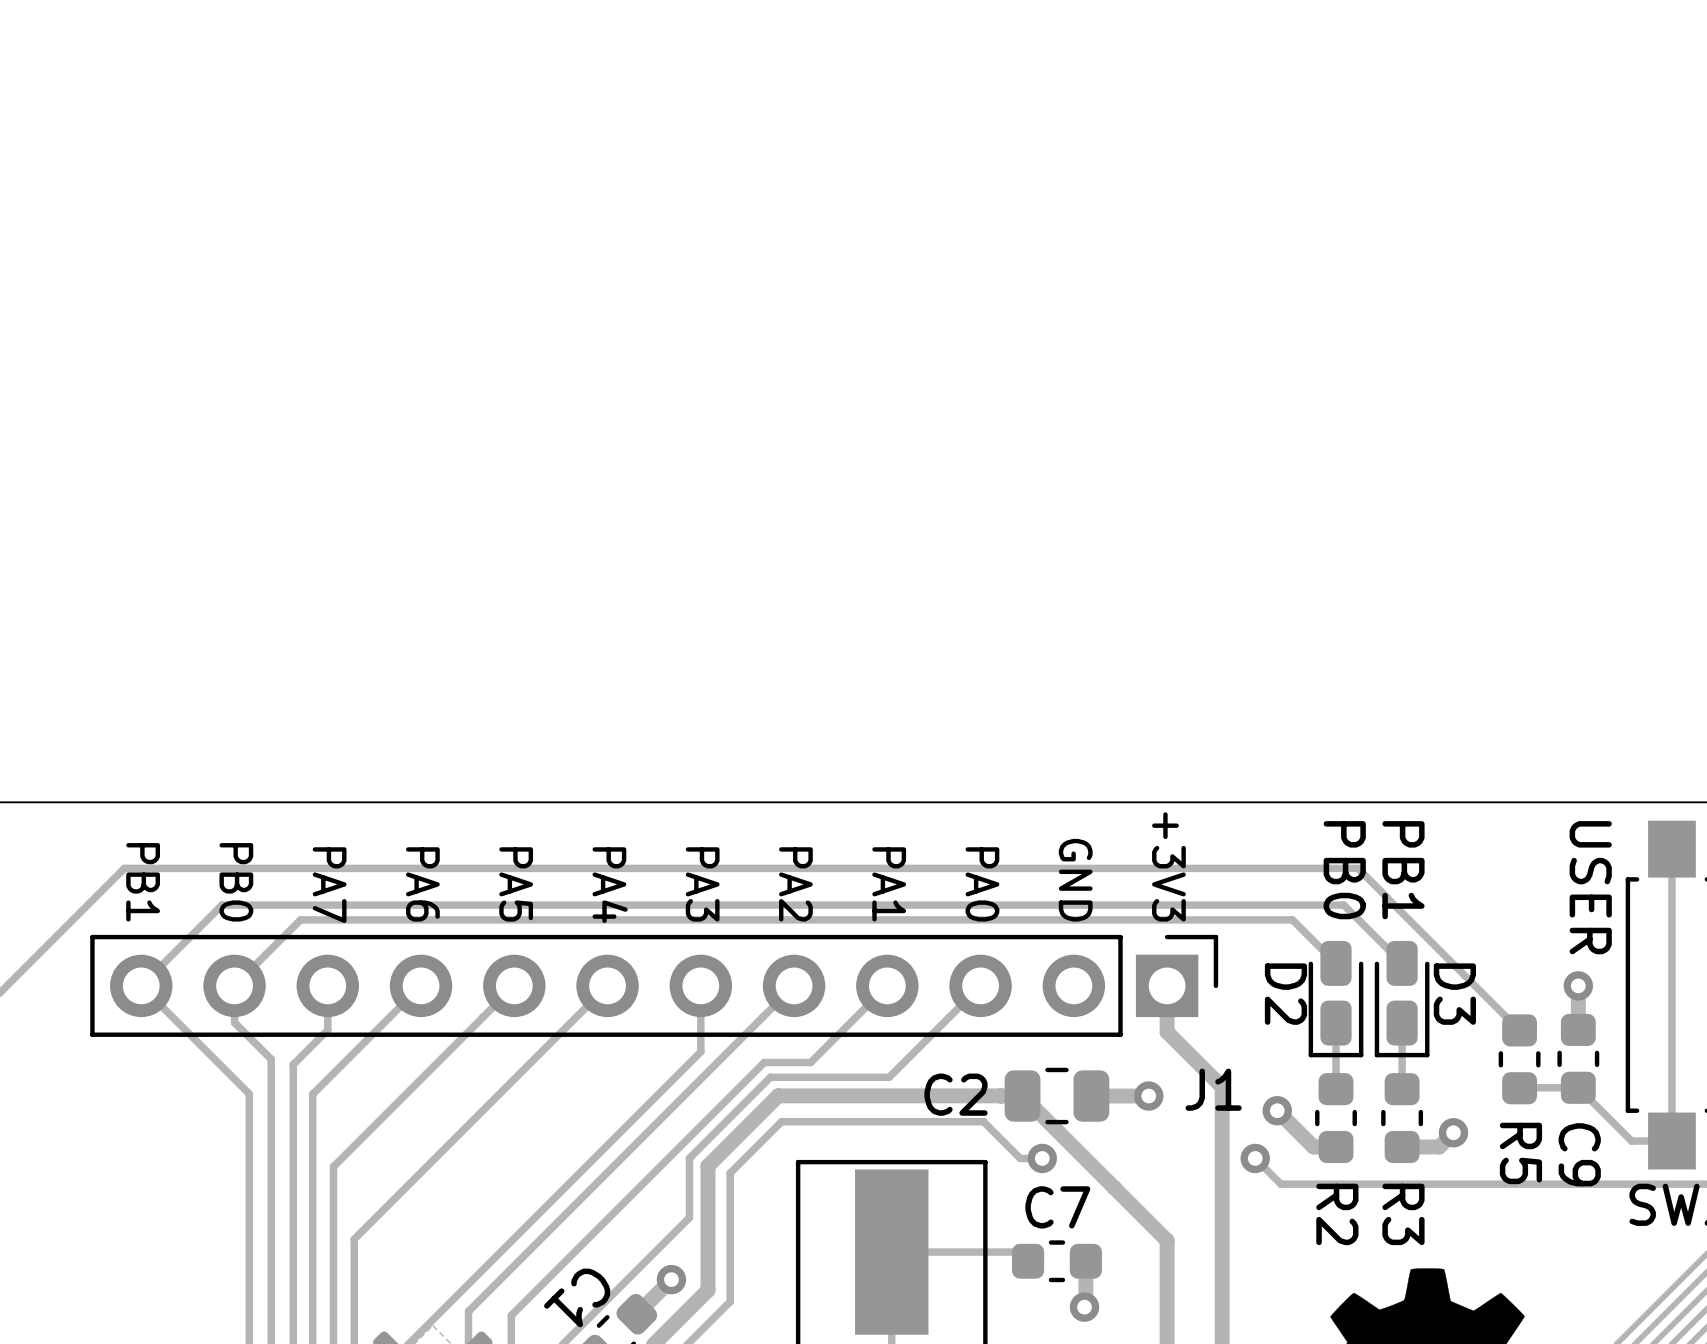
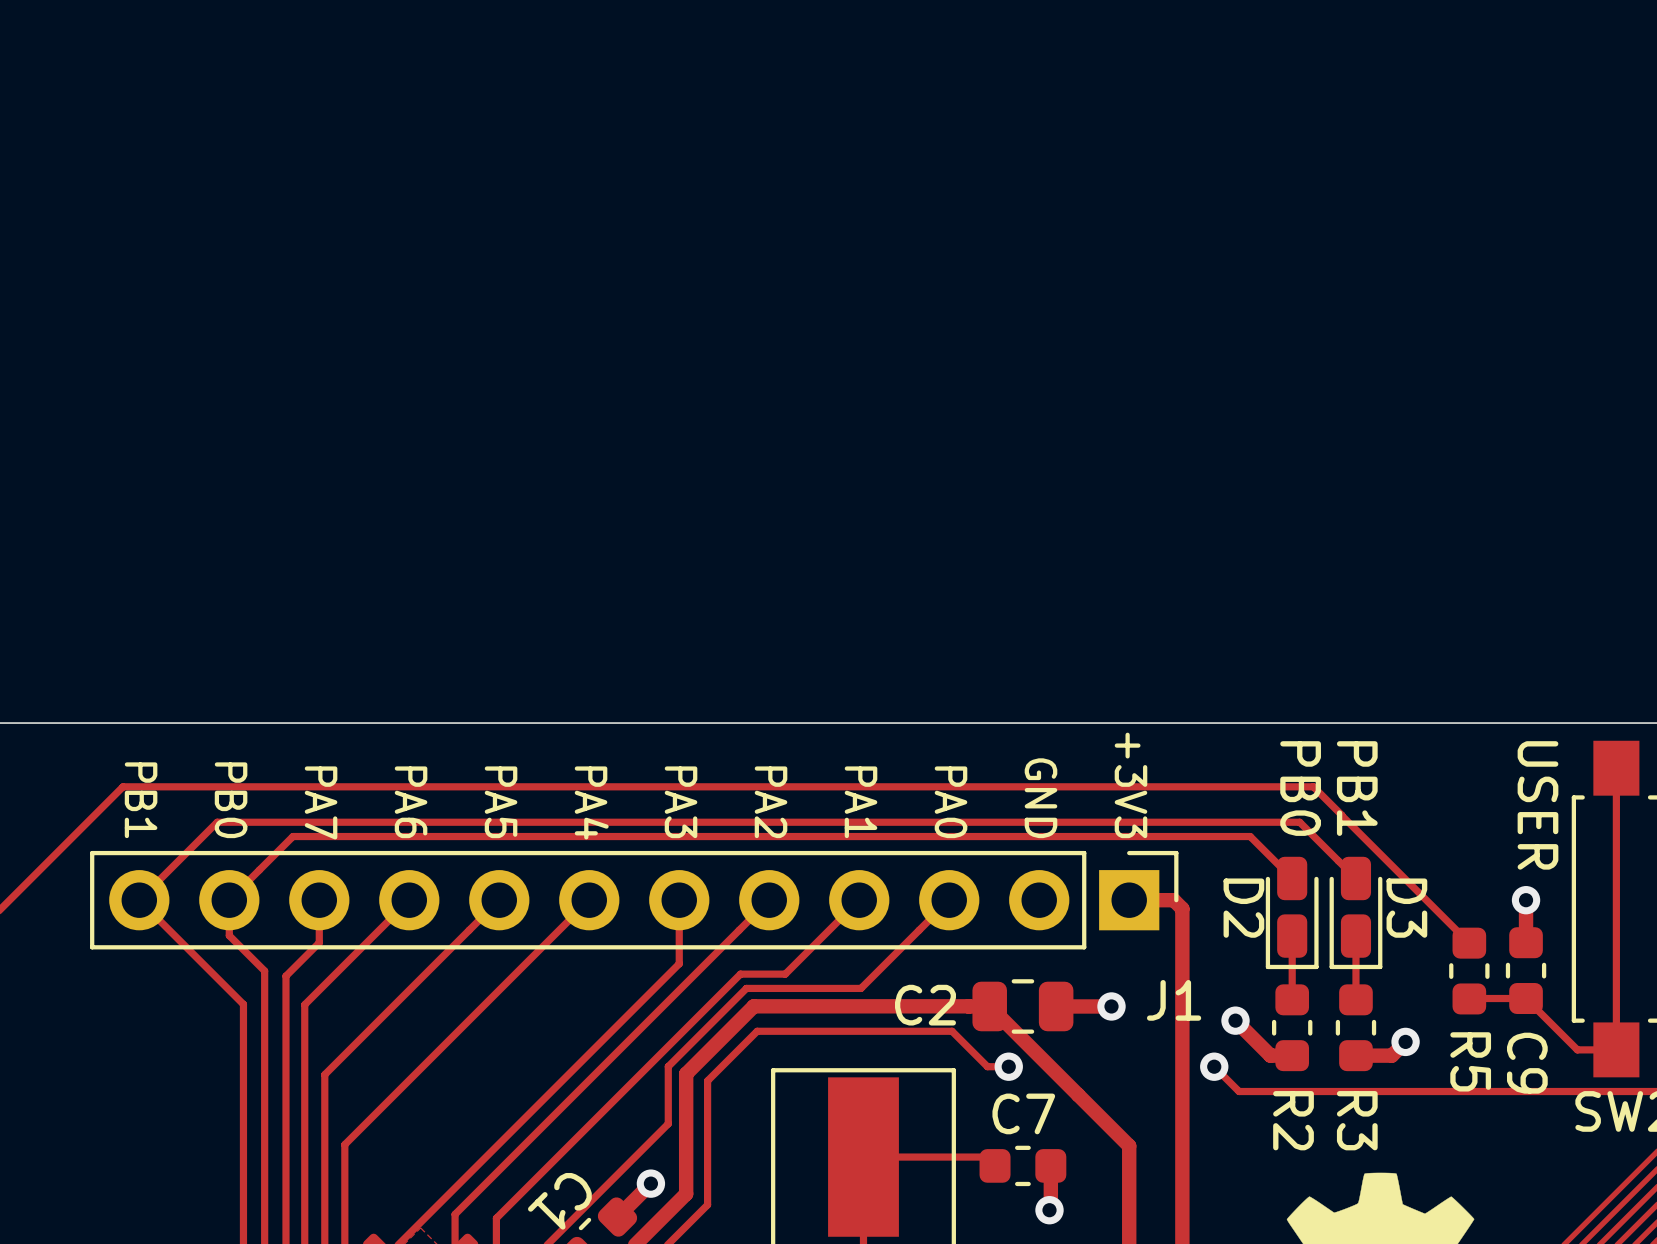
track: (1167, 985) (1167, 1032) (1222, 1087) -> (1129, 900) (1173, 900) (1182, 908) (1182, 997)

